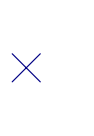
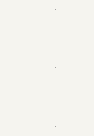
no-connect mark: (26, 67) -> none

